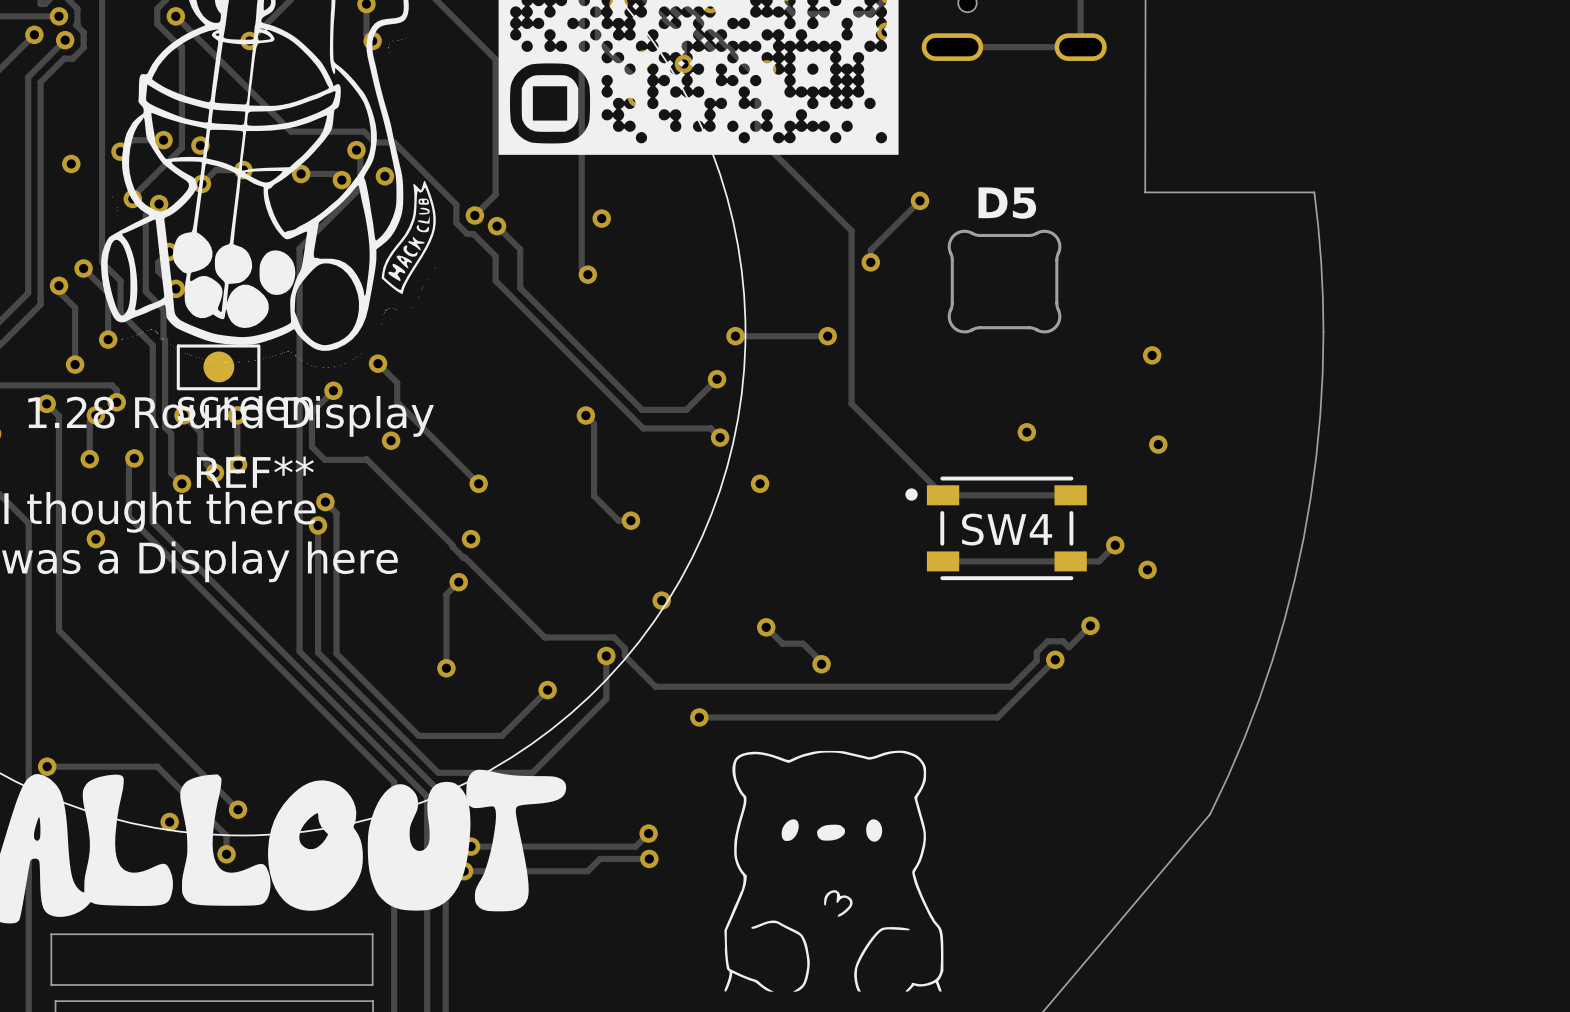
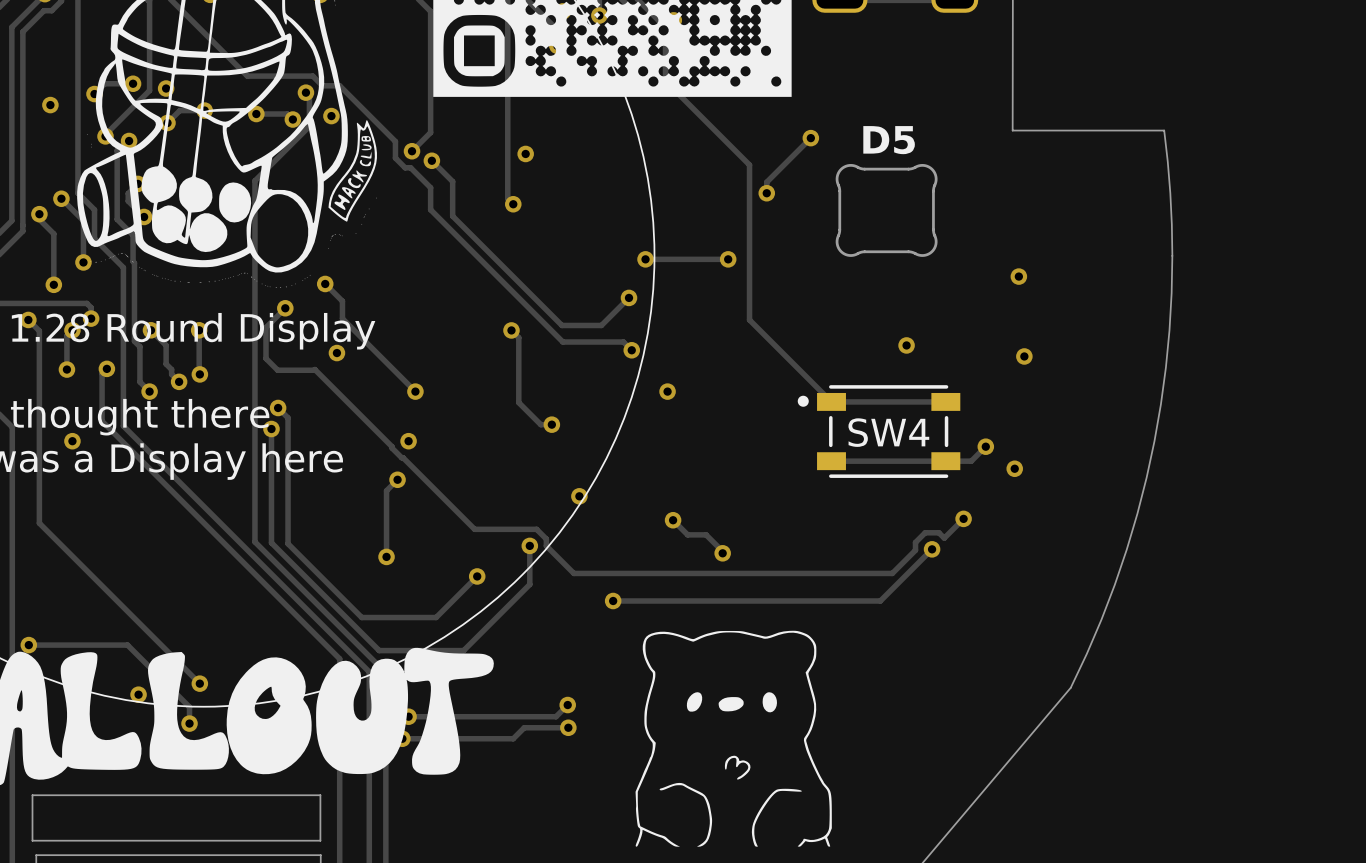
REF**: (218, 367) -> none

